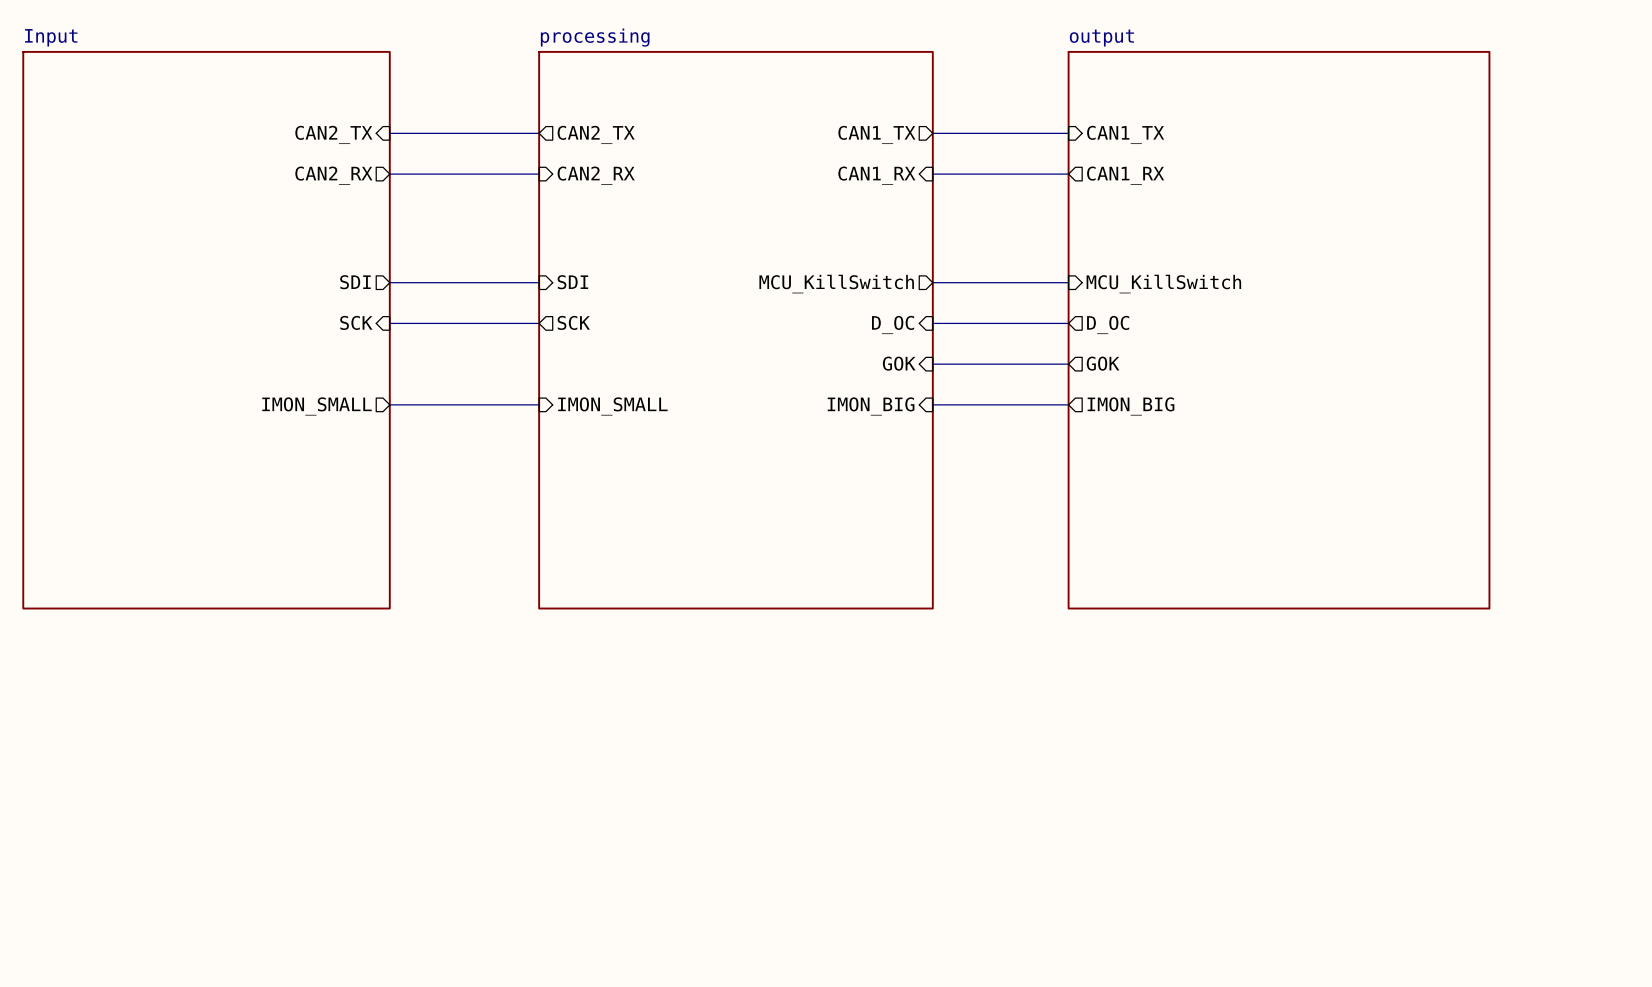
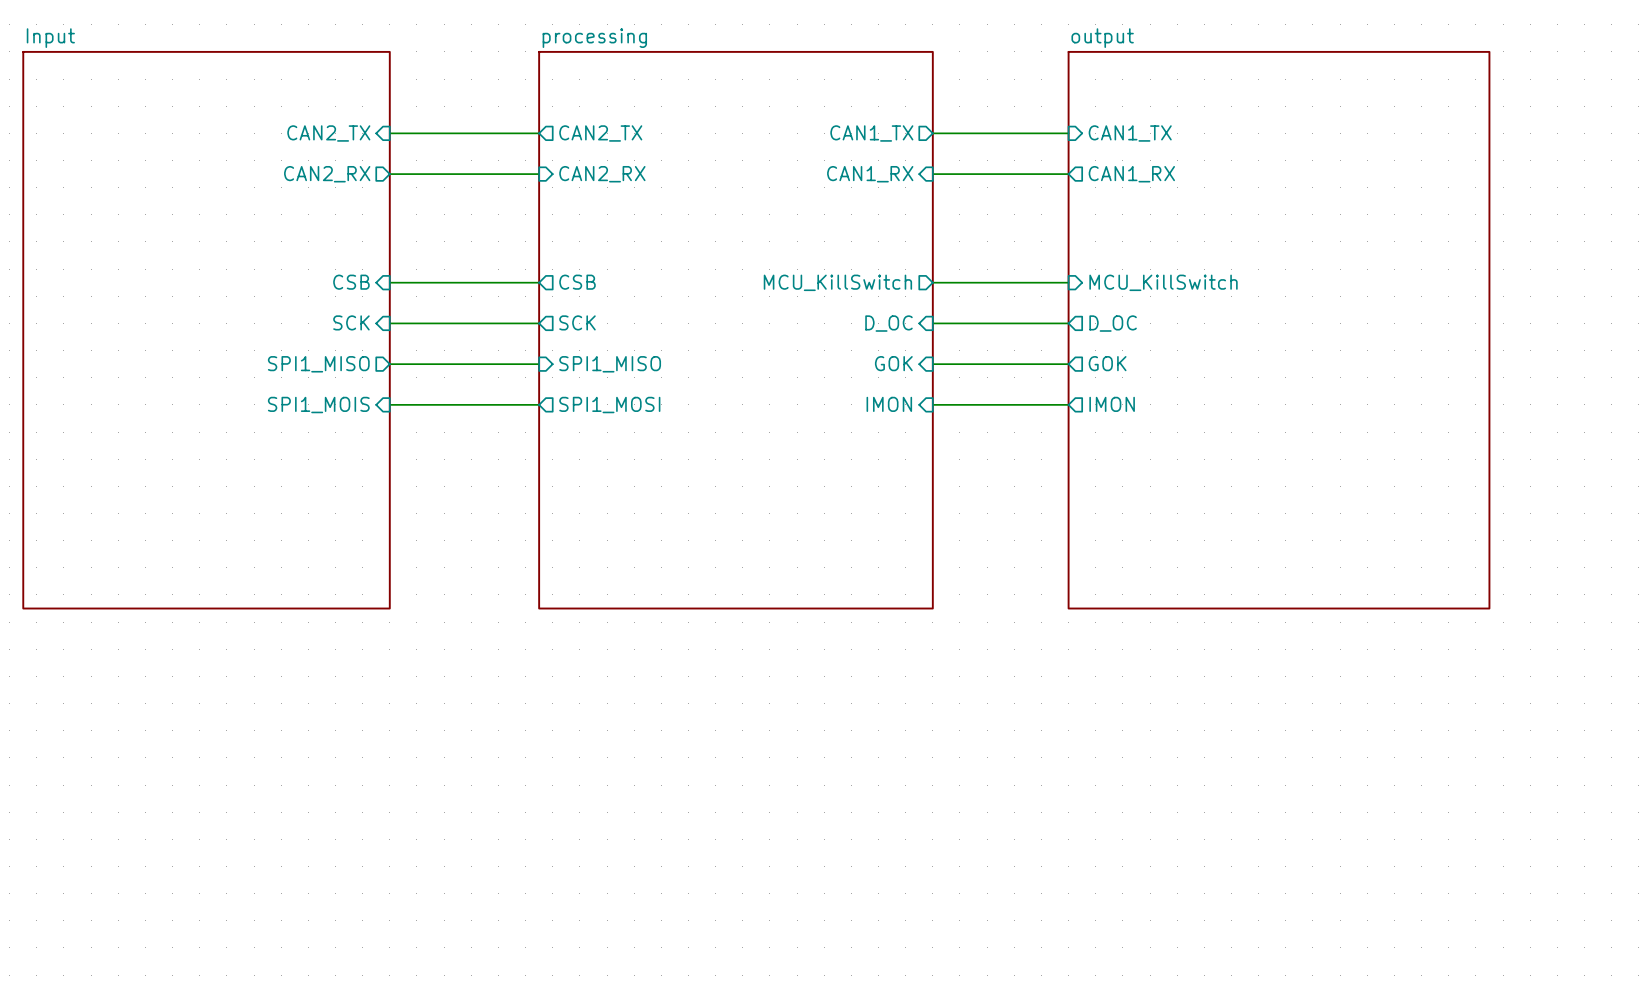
sheet pin shape: output (355, 282) -> input (351, 282)
sheet pin: SDI (355, 282) -> CSB (351, 282)
sheet pin shape: input (572, 282) -> output (577, 282)
sheet pin: SDI (572, 282) -> CSB (577, 282)
wire: none -> (389, 364) (539, 364)
sheet pin: none -> SPI1_MISO (318, 364)
sheet pin: none -> SPI1_MISO (610, 364)
sheet pin shape: output (316, 406) -> input (318, 405)
sheet pin: IMON_SMALL (316, 406) -> SPI1_MOIS (318, 405)
sheet pin shape: input (612, 406) -> output (609, 405)
sheet pin: IMON_SMALL (612, 406) -> SPI1_MOSI (609, 405)
sheet pin: IMON_BIG (871, 406) -> IMON (889, 404)
sheet pin: IMON_BIG (1131, 406) -> IMON (1112, 404)

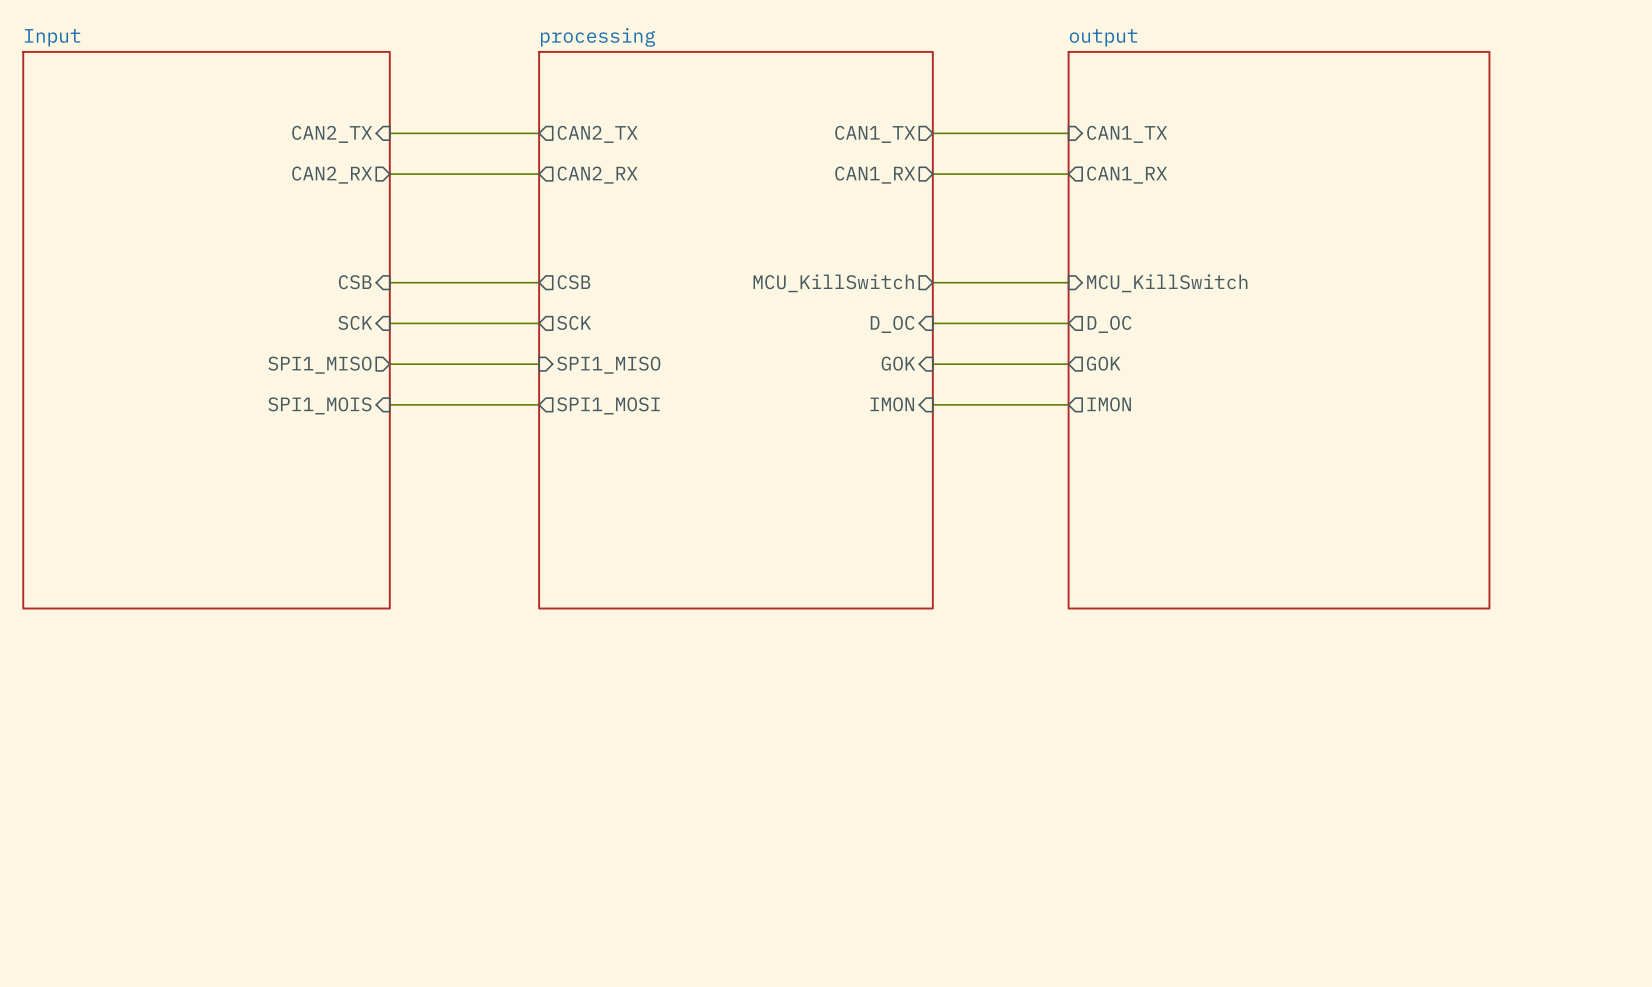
sheet pin shape: input (602, 174) -> output (597, 175)
sheet pin shape: input (870, 174) -> output (875, 175)

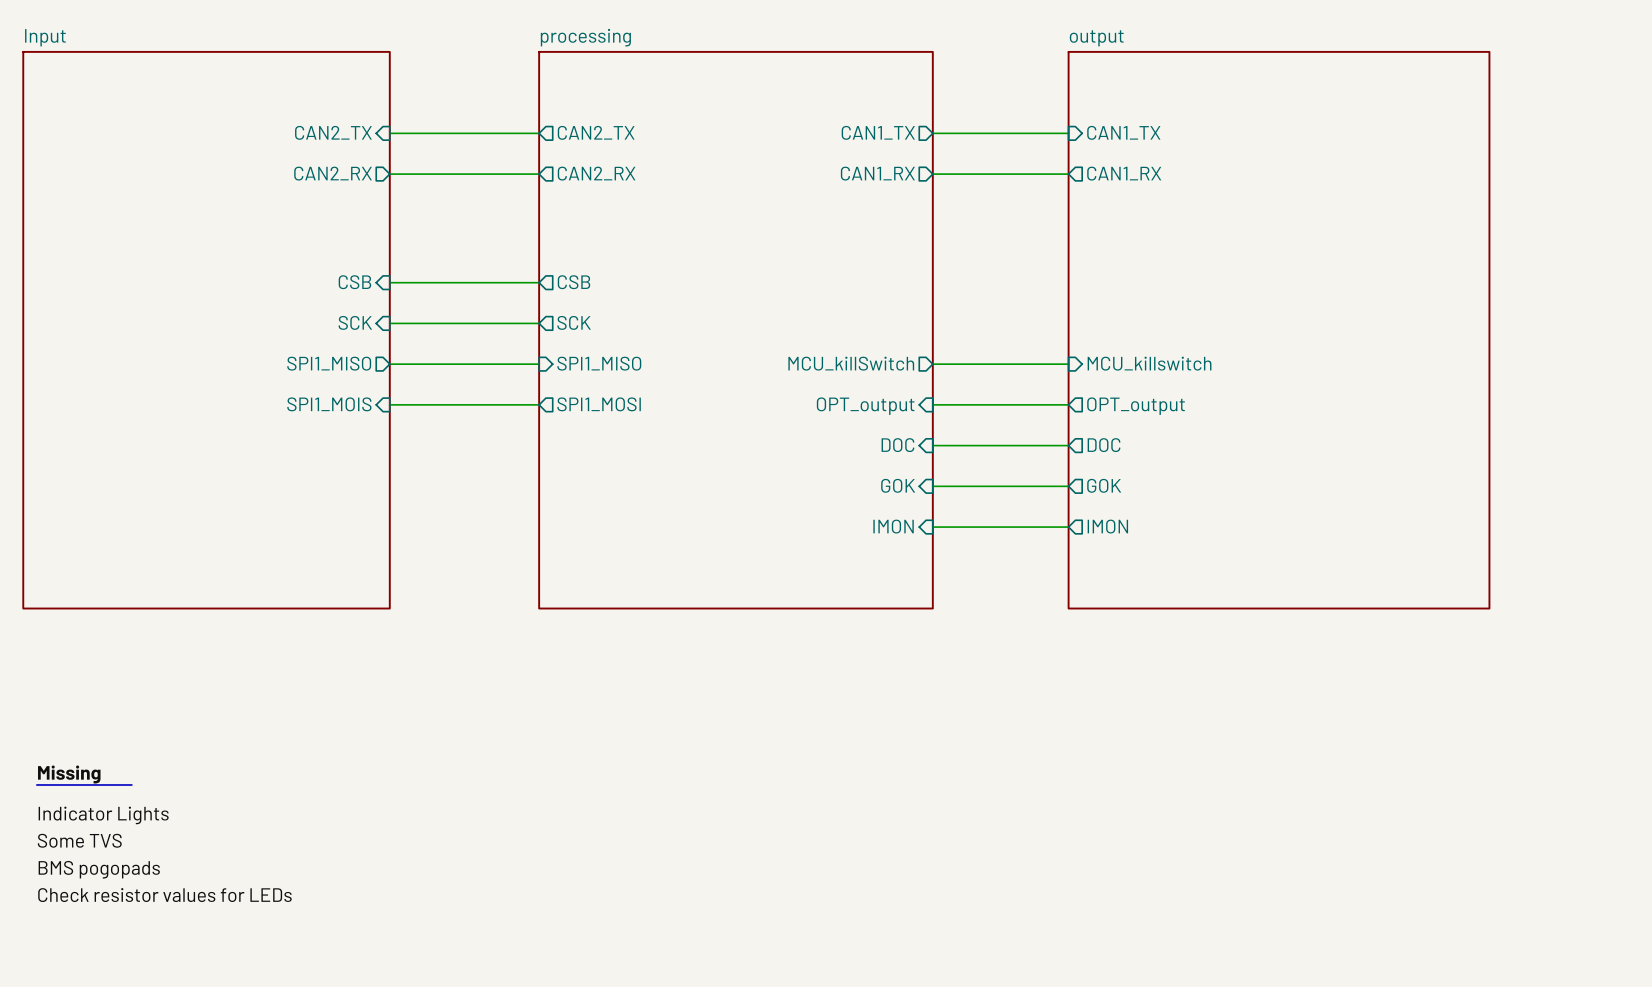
wire: (932, 282) (1068, 282) -> (932, 445) (1068, 445)
sheet pin: MCU_KillSwitch (833, 283) -> none
sheet pin: MCU_KillSwitch (1167, 283) -> none
wire: (932, 323) (1068, 323) -> (932, 486) (1068, 486)
sheet pin: D_OC (892, 324) -> none
sheet pin: D_OC (1109, 324) -> none
sheet pin shape: input (898, 363) -> output (851, 363)
sheet pin: GOK (898, 363) -> MCU_killSwitch (851, 363)
sheet pin shape: output (1103, 363) -> input (1149, 363)
sheet pin: GOK (1103, 363) -> MCU_killswitch (1149, 363)
sheet pin: IMON (892, 404) -> OPT_output (865, 406)
sheet pin: IMON (1109, 404) -> OPT_output (1136, 406)
sheet pin: none -> DOC (897, 445)
sheet pin: none -> DOC (1104, 445)
sheet pin: none -> GOK (898, 485)
sheet pin: none -> GOK (1104, 485)
sheet pin: none -> IMON (893, 526)
sheet pin: none -> IMON (1107, 526)
wire: none -> (932, 527) (1068, 527)
label: none -> Missing (69, 774)
bus: none -> (36, 785) (131, 785)
label: none -> Indicator Lights (103, 815)
label: none -> Some TVS (79, 840)
label: none -> BMS pogopads (99, 869)
label: none -> Check resistor values for LEDs (164, 895)

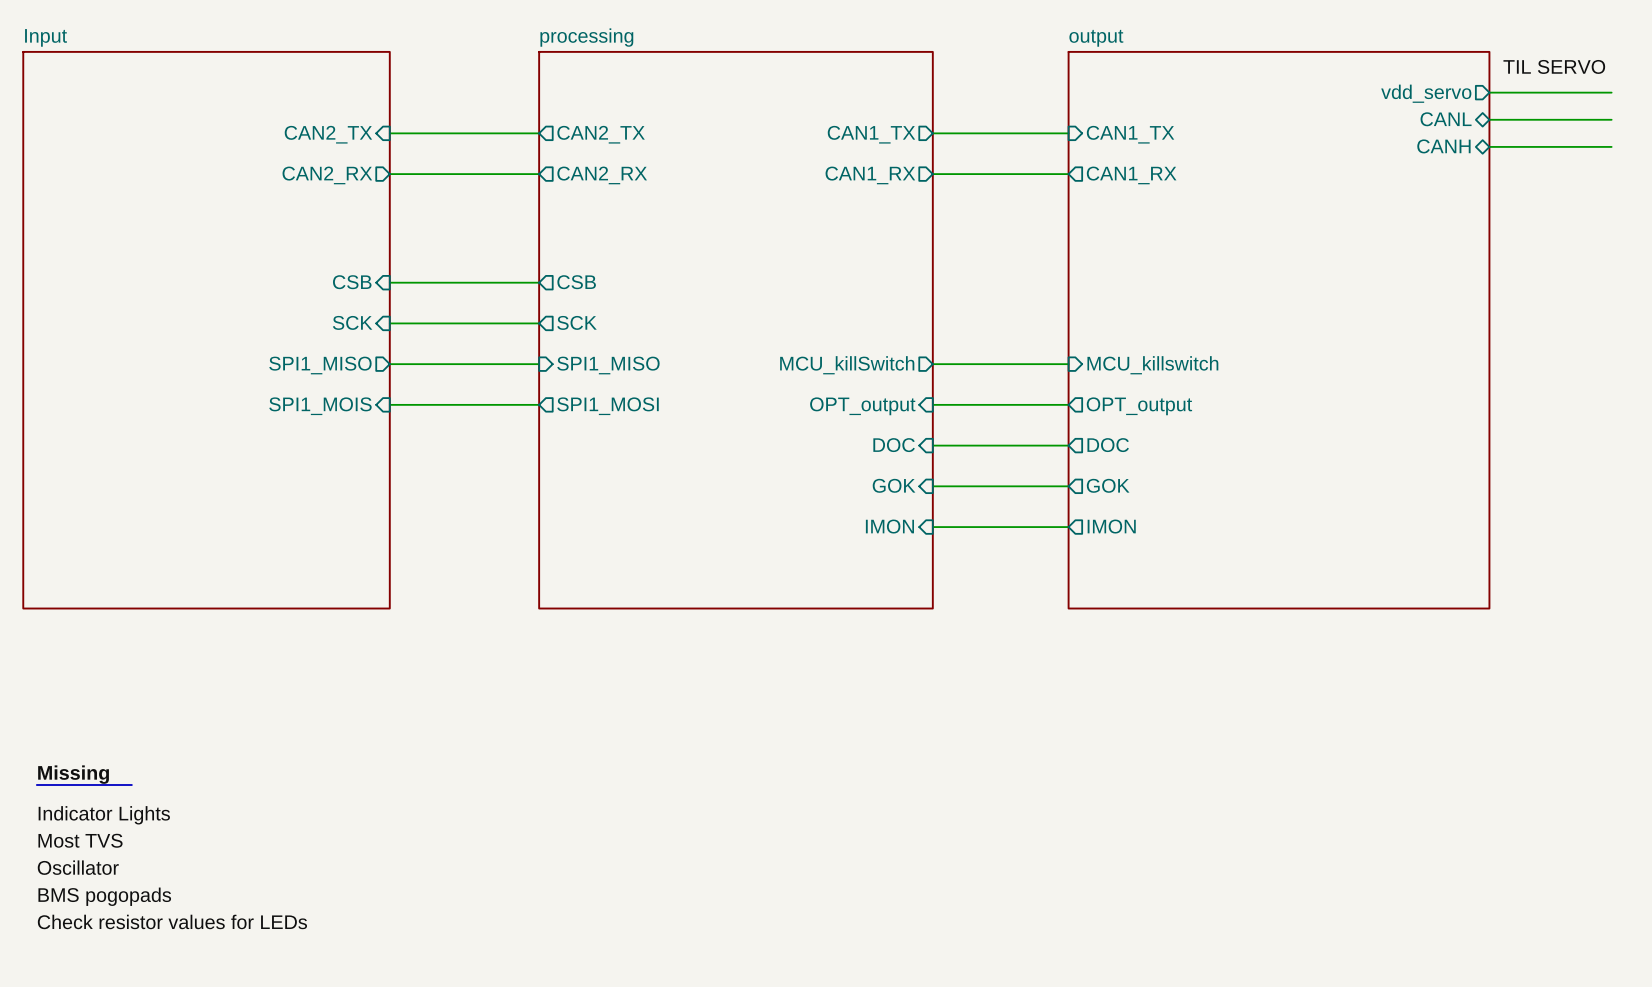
label: none -> TIL SERVO (1554, 66)
sheet pin: none -> vdd_servo (1426, 93)
wire: none -> (1489, 92) (1611, 92)
sheet pin: none -> CANL (1446, 119)
wire: none -> (1489, 119) (1611, 119)
sheet pin: none -> CANH (1443, 146)
wire: none -> (1489, 146) (1611, 146)
label: Some TVS (79, 840) -> Most TVS (80, 840)
label: BMS pogopads (99, 869) -> Oscillator (78, 867)
label: Check resistor values for LEDs (164, 895) -> BMS pogopads (104, 896)
label: none -> Check resistor values for LEDs (172, 921)

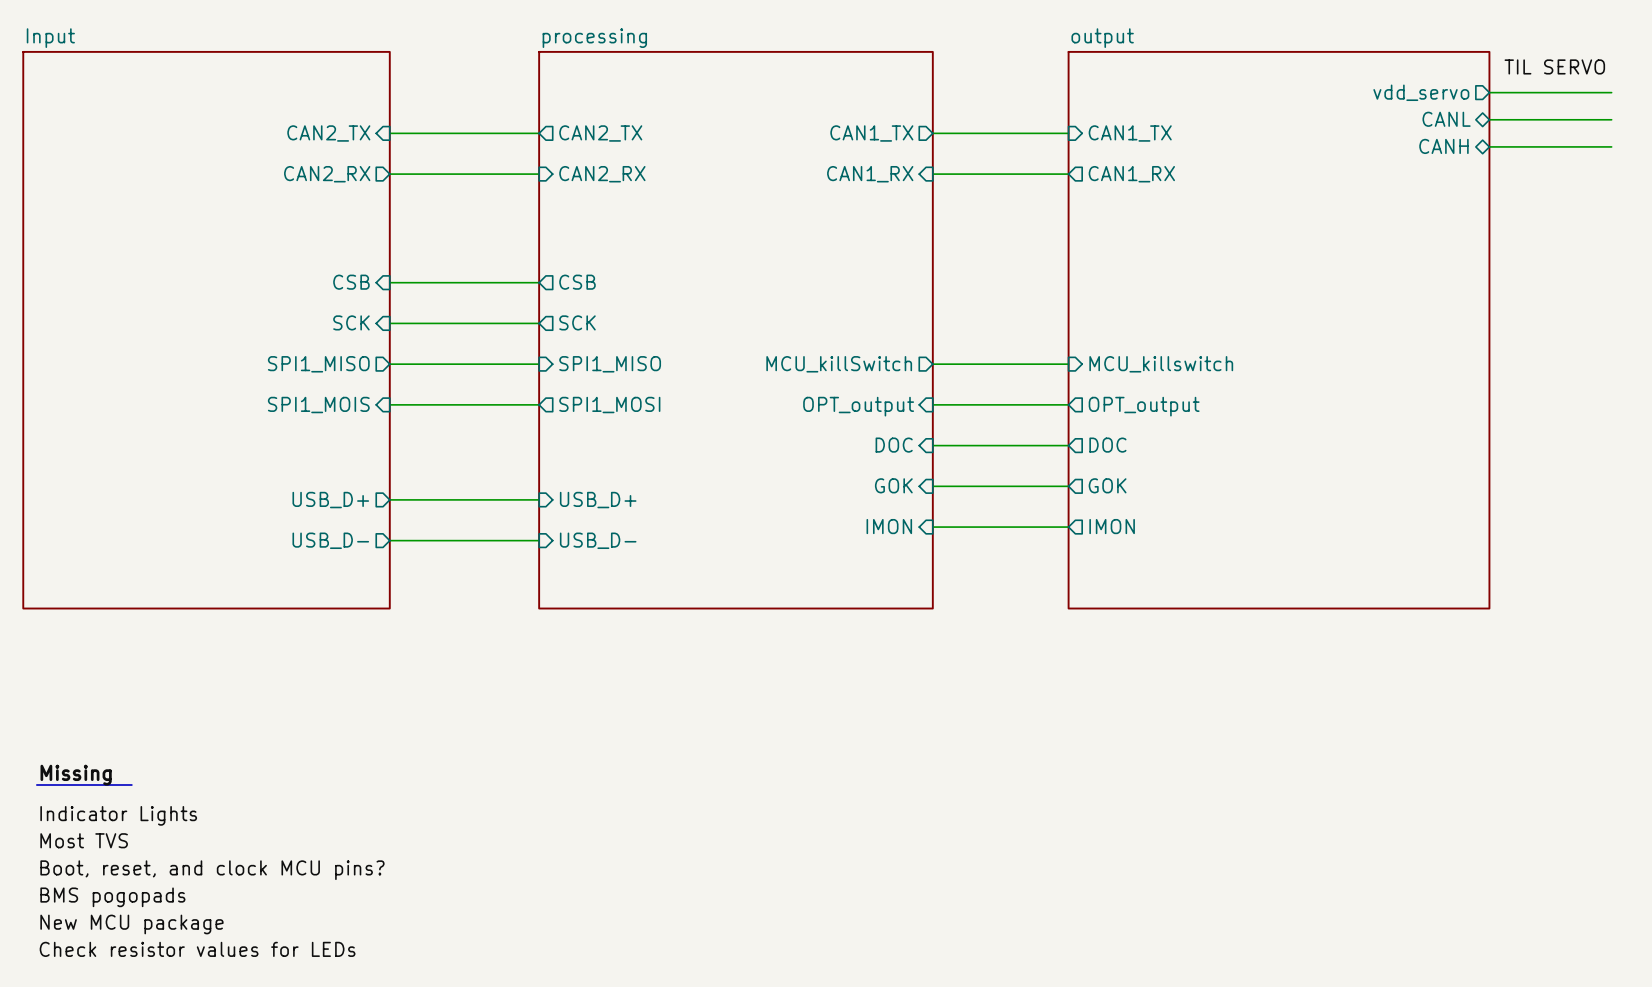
sheet pin shape: output (602, 175) -> input (602, 174)
sheet pin shape: output (870, 175) -> input (870, 174)
wire: none -> (389, 499) (539, 499)
sheet pin: none -> USB_D+ (330, 500)
sheet pin: none -> USB_D+ (598, 500)
wire: none -> (389, 540) (539, 540)
sheet pin: none -> USB_D- (330, 540)
sheet pin: none -> USB_D- (598, 540)
label: Oscillator (78, 867) -> Boot, reset, and clock MCU pins? (212, 870)
label: Check resistor values for LEDs (172, 921) -> New MCU package (131, 924)
label: none -> Check resistor values for LEDs (197, 949)

